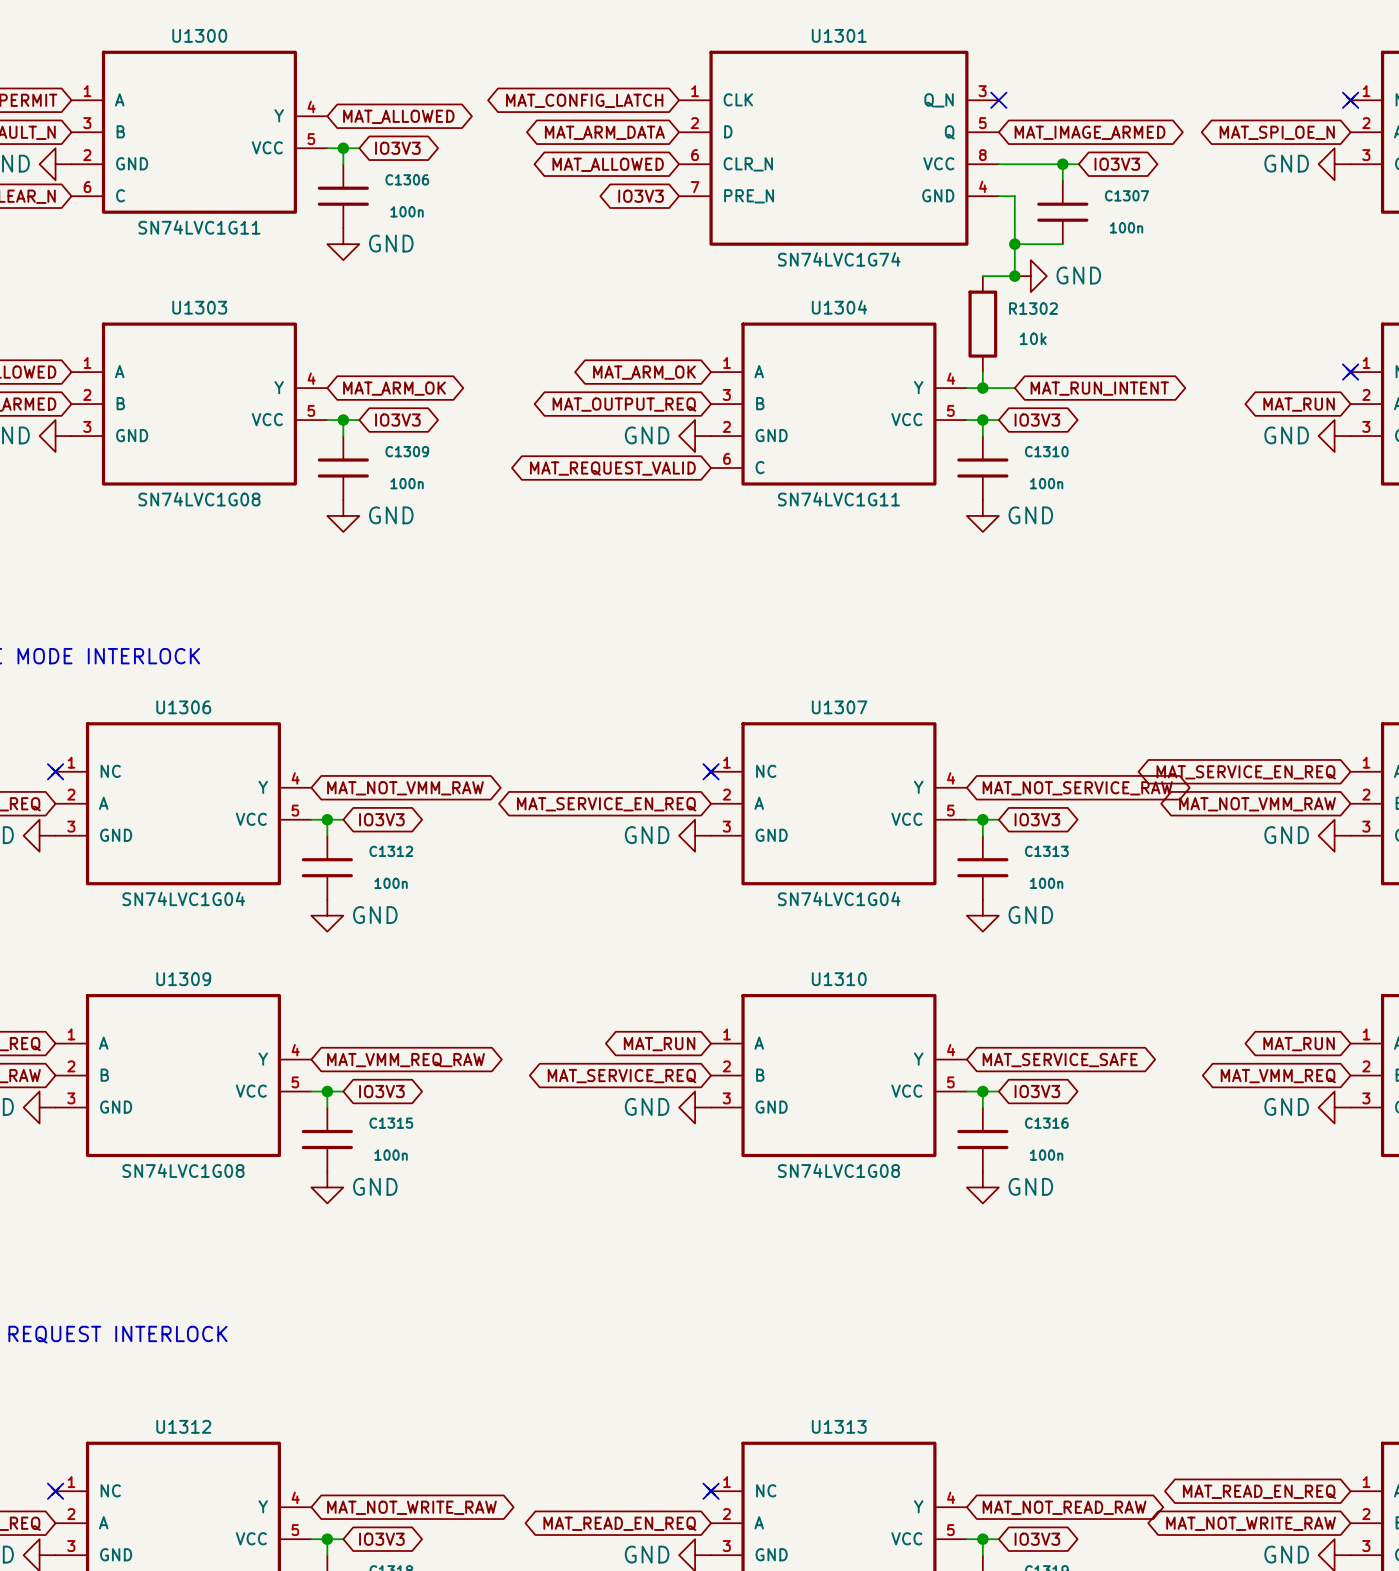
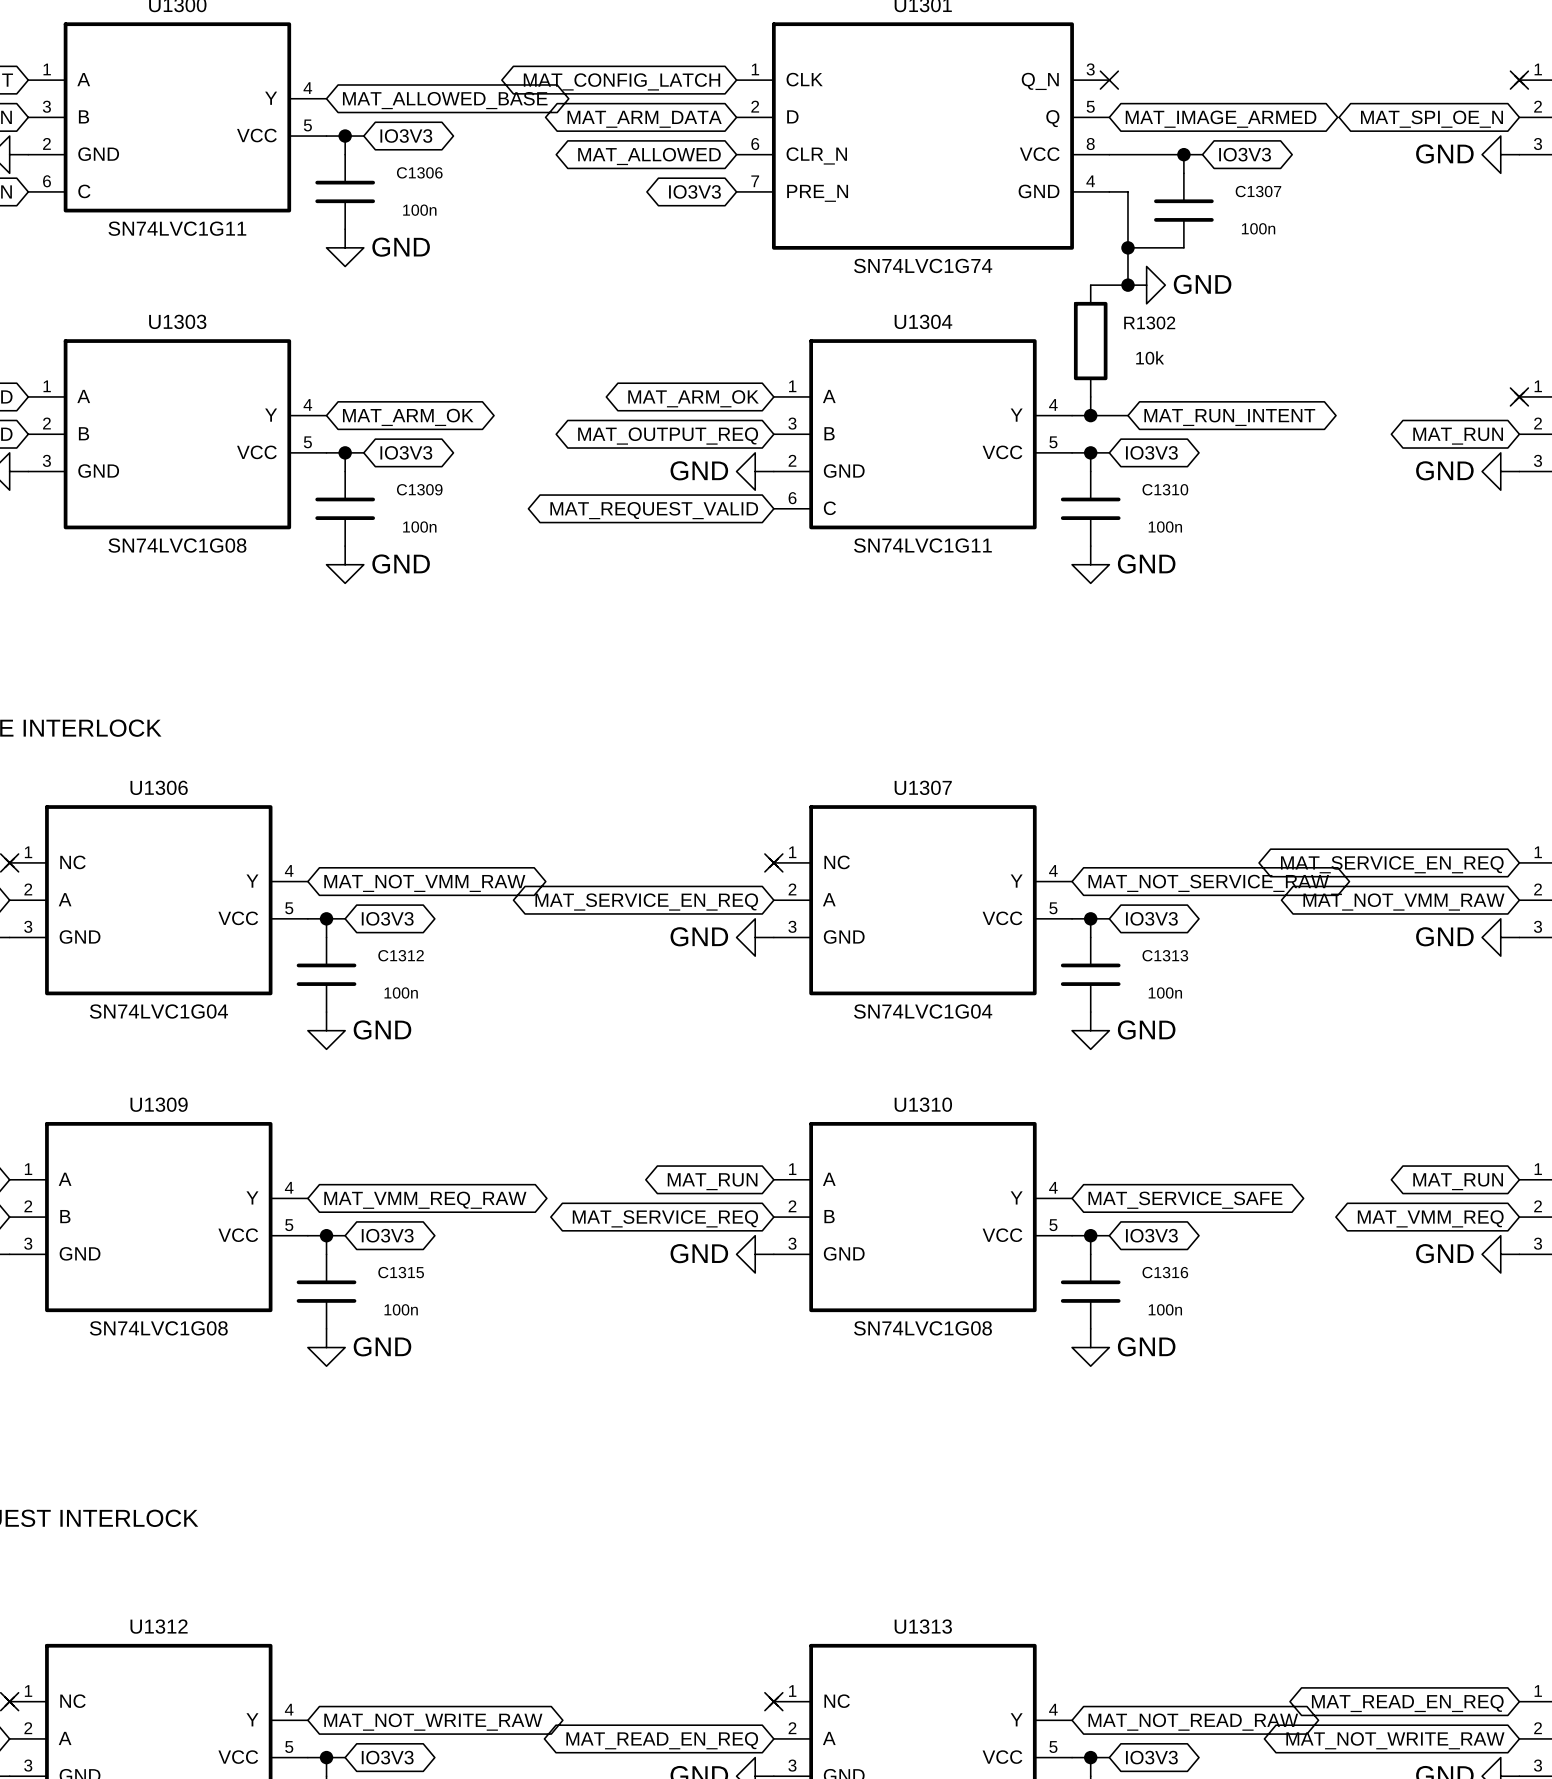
global label: MAT_ALLOWED (398, 116) -> MAT_ALLOWED_BASE (445, 100)

